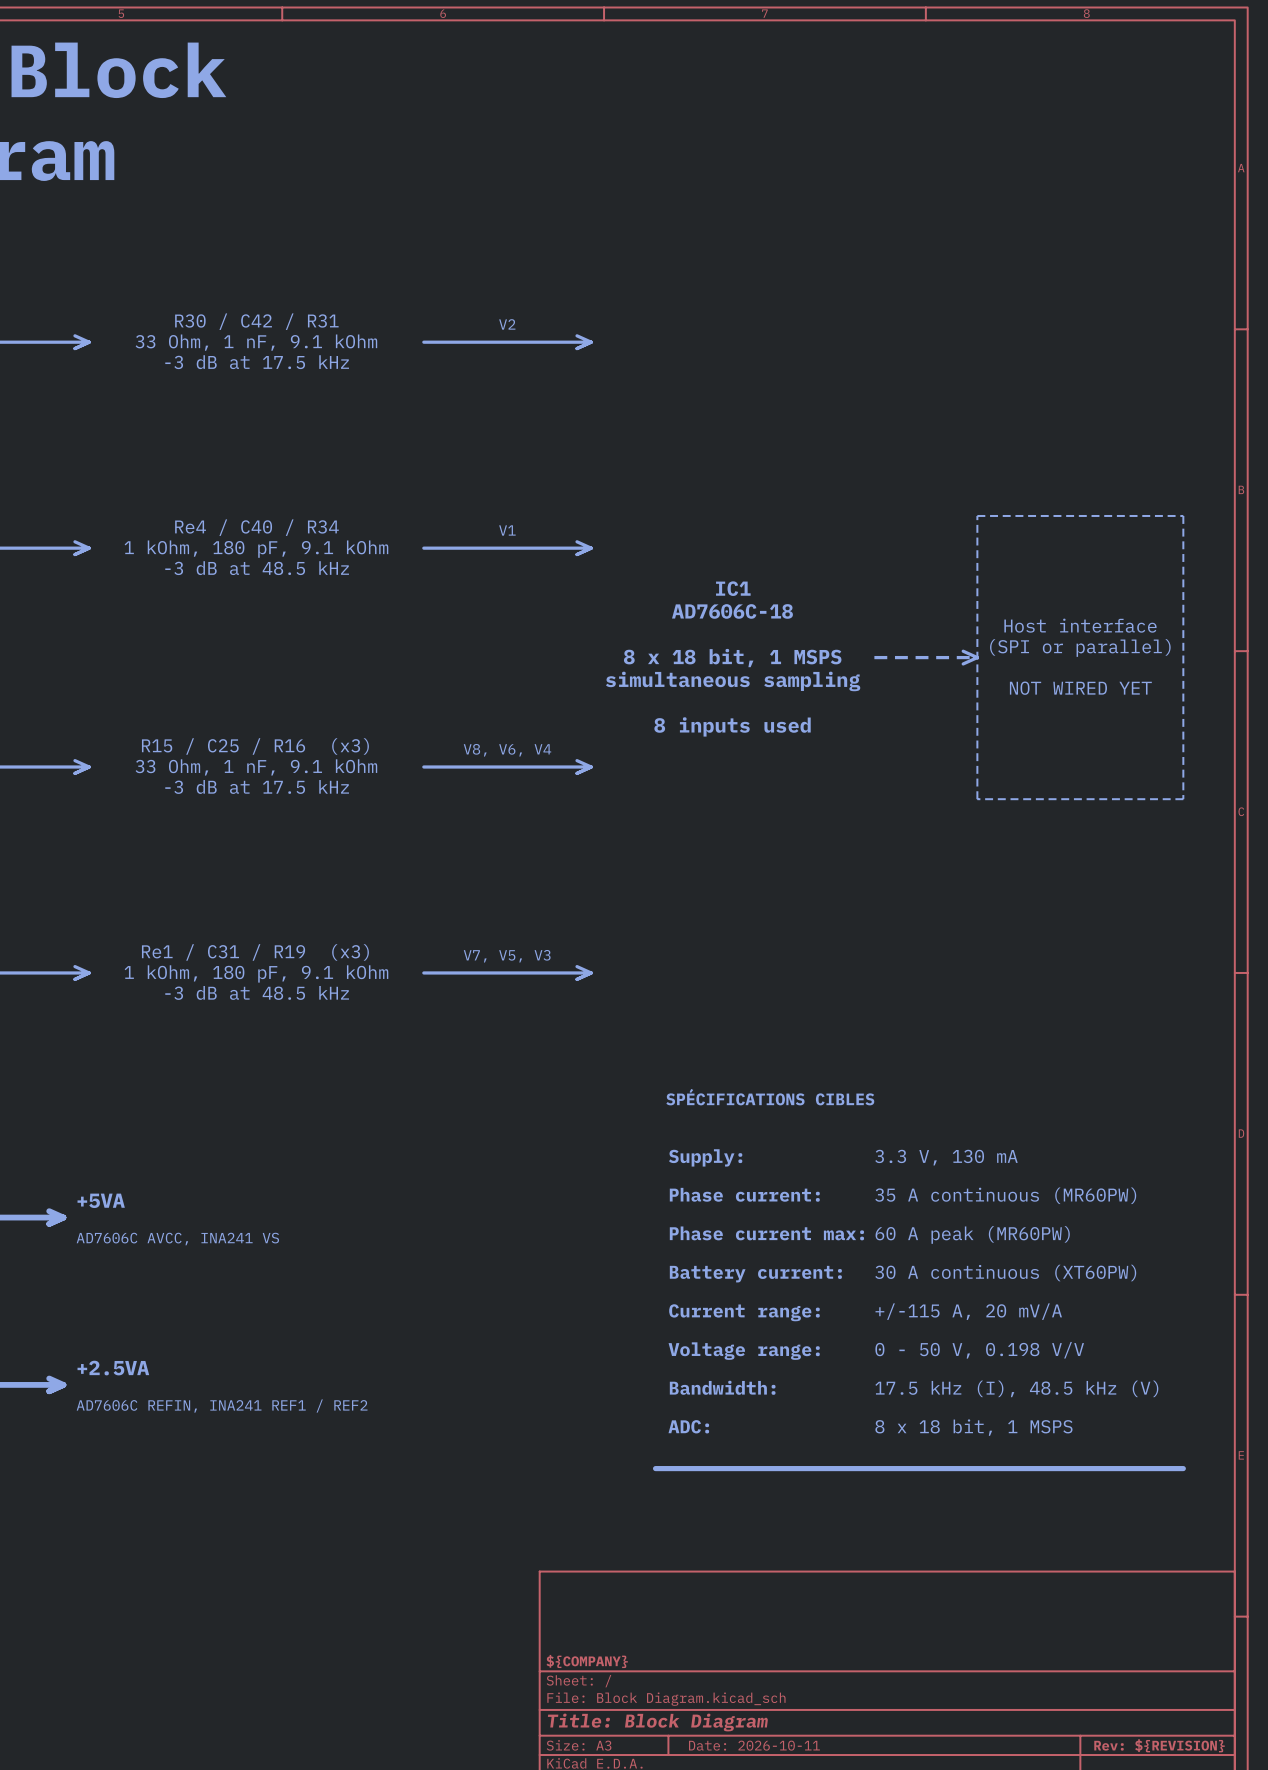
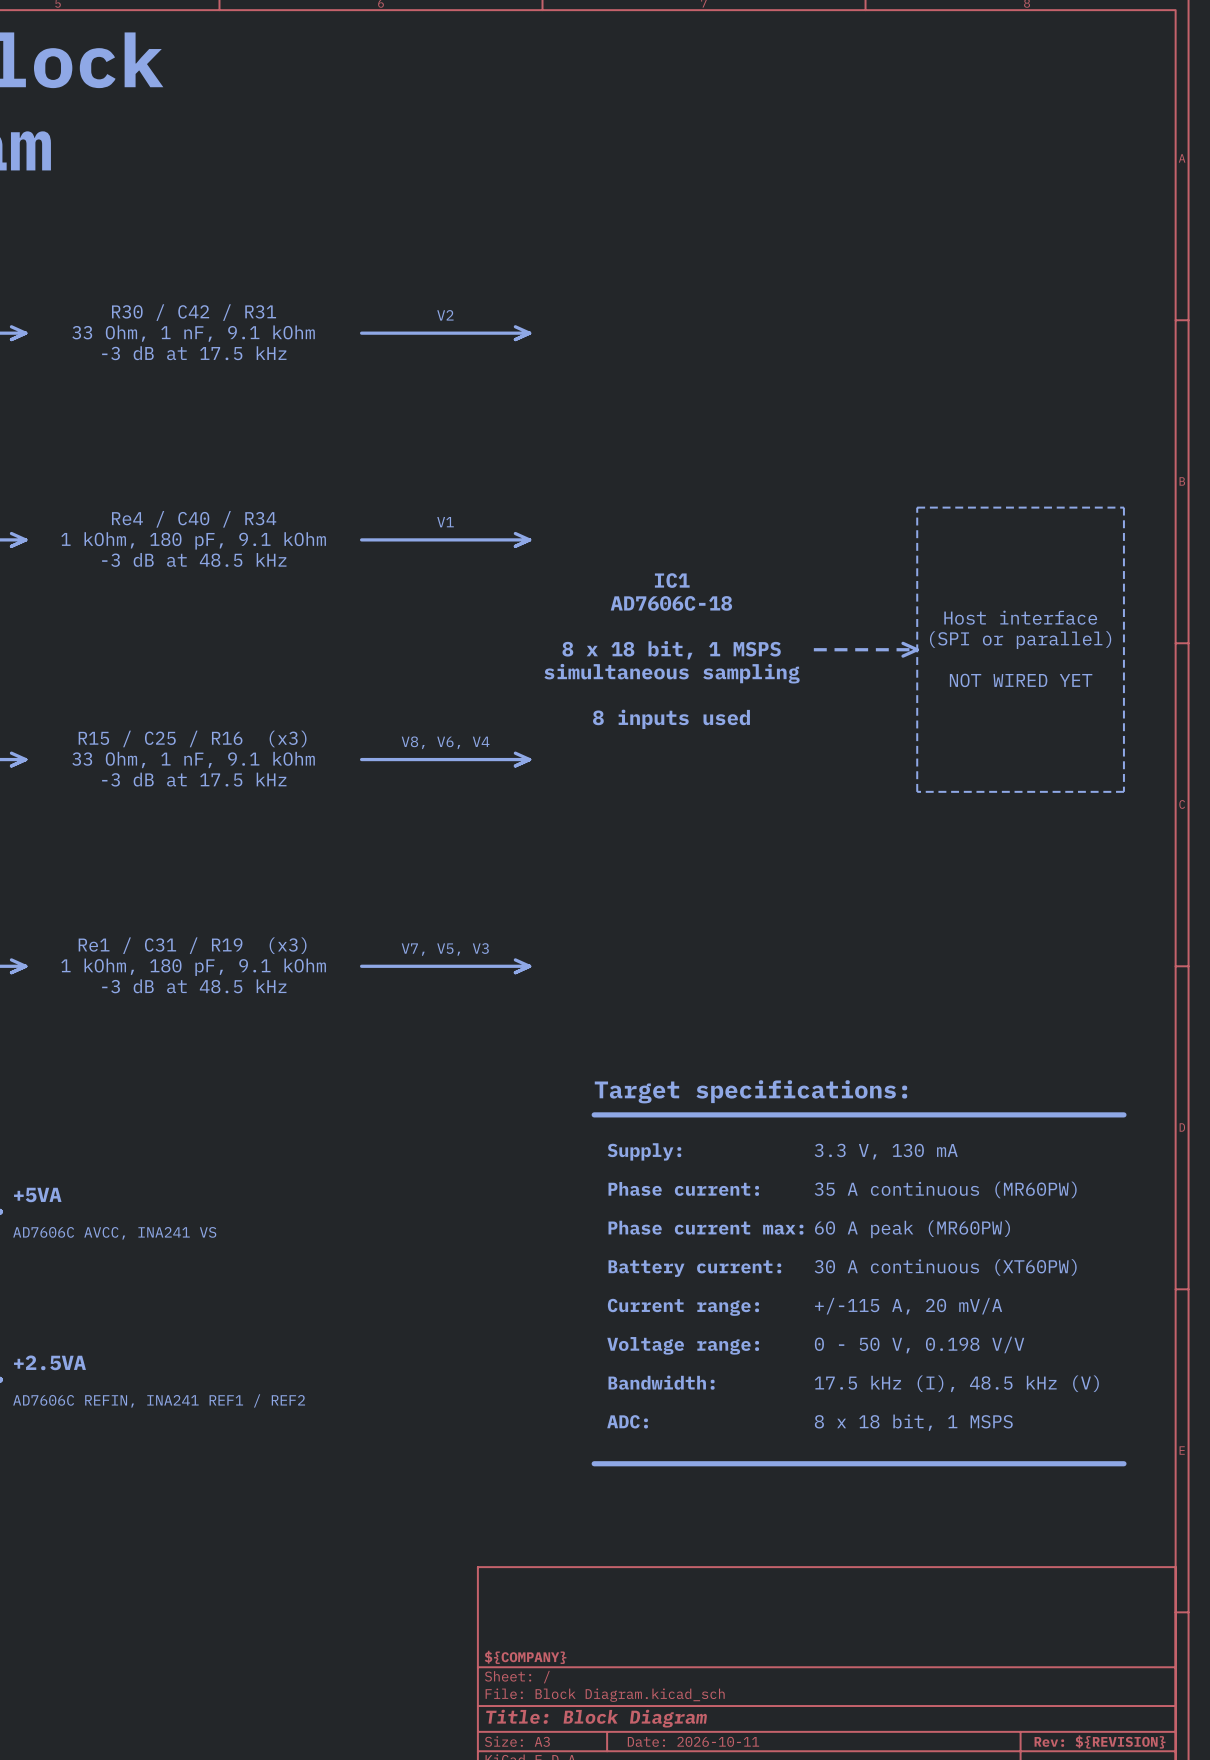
text: SPÉCIFICATIONS CIBLES (770, 1097) -> none
text: none -> Target specifications: (750, 1091)
line: none -> (594, 1114) (1123, 1114)

